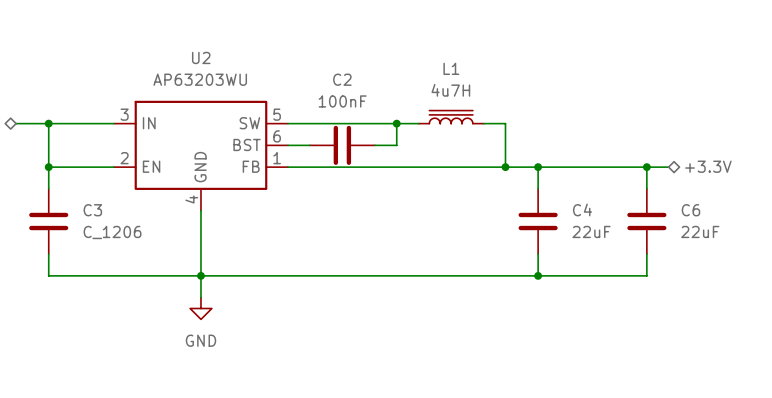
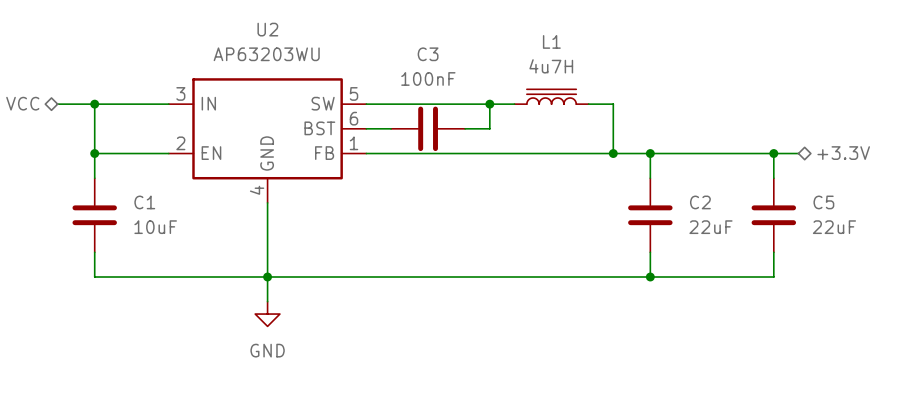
C2 name: C2 (342, 79) -> C3 (428, 54)
C4 name: C4 (582, 209) -> C2 (700, 202)
C3 name: C3 (92, 210) -> C1 (144, 202)
C6 name: C6 (690, 210) -> C5 (823, 202)
C3 value: C_1206 (112, 232) -> 10uF (155, 227)

